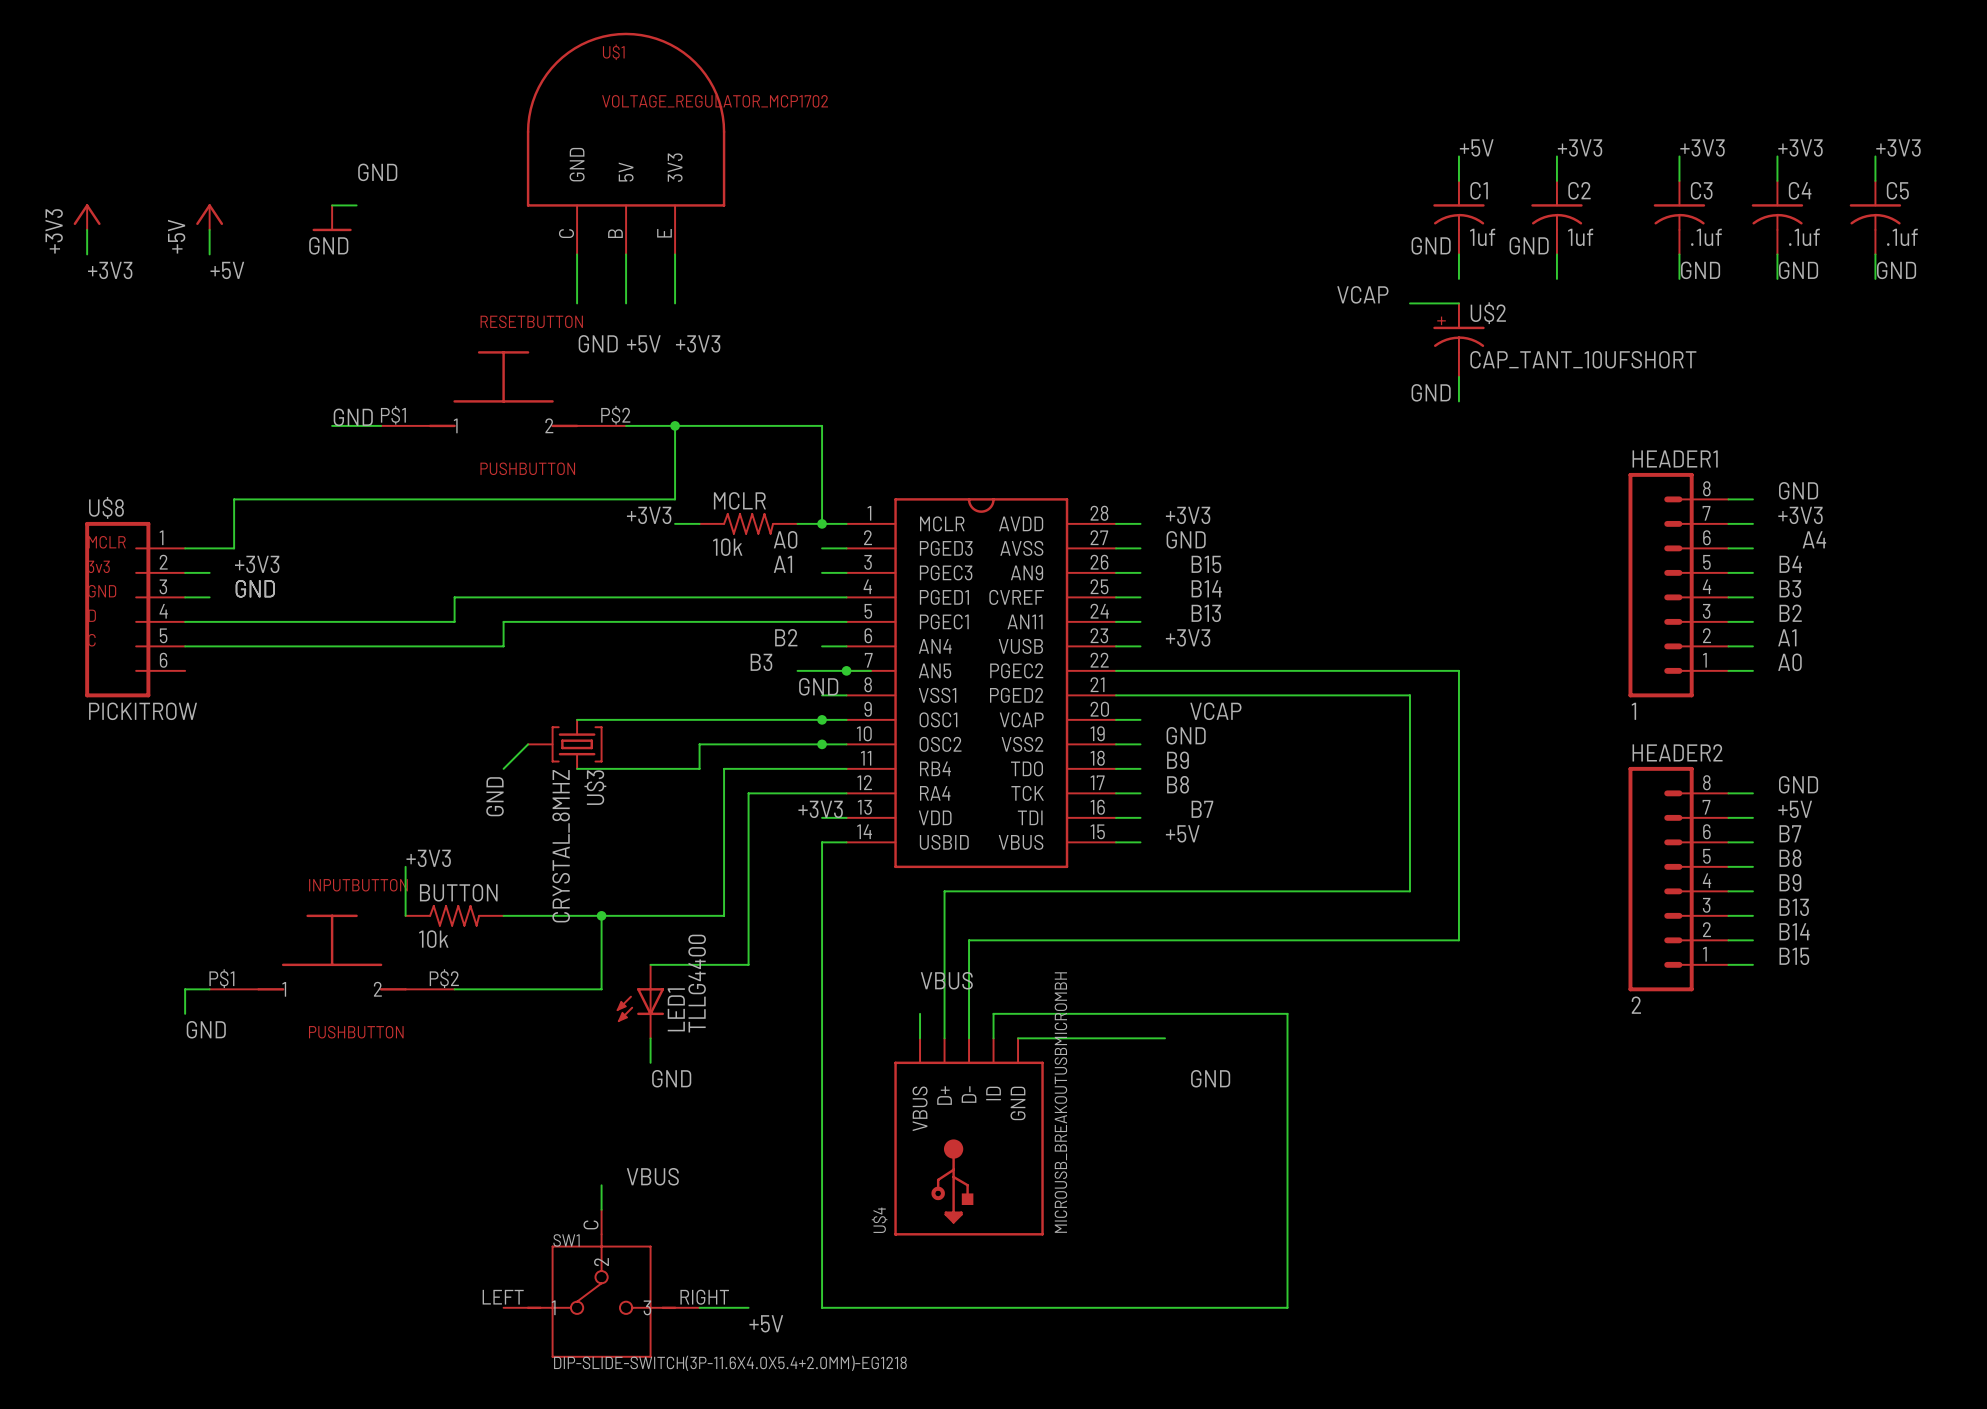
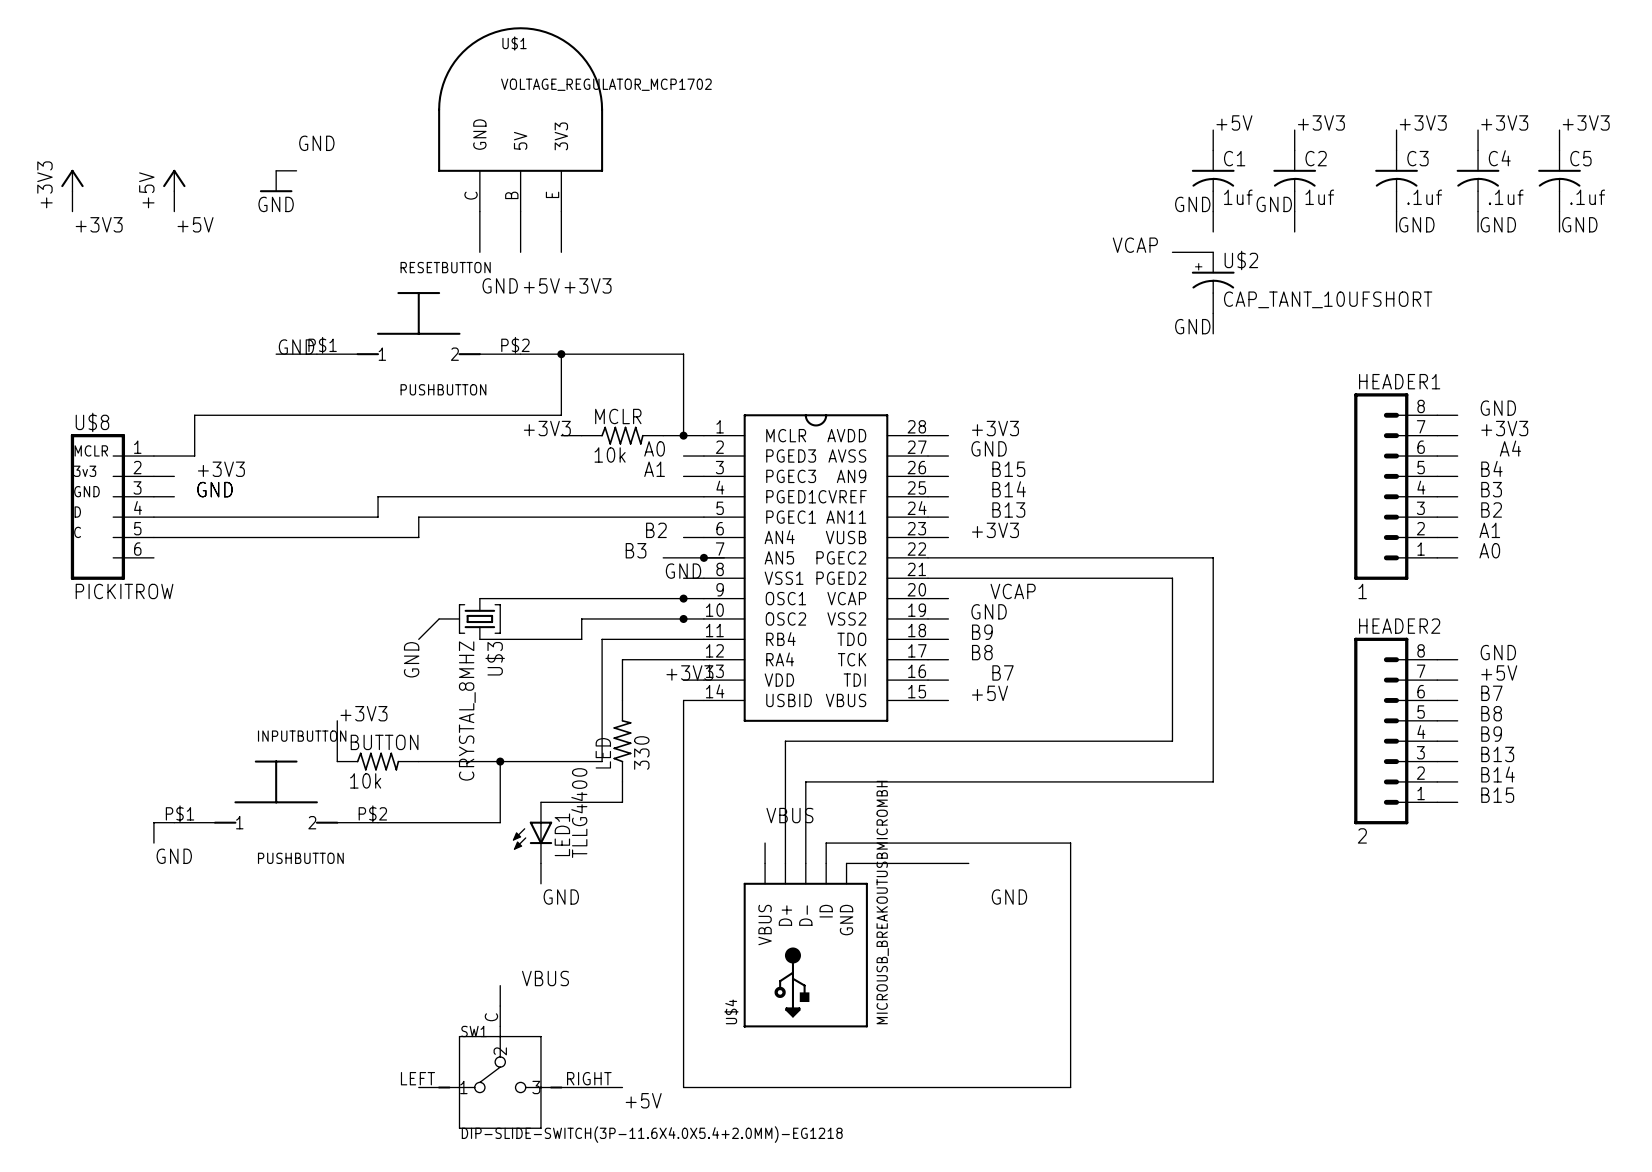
LED: none -> 330 (622, 741)

